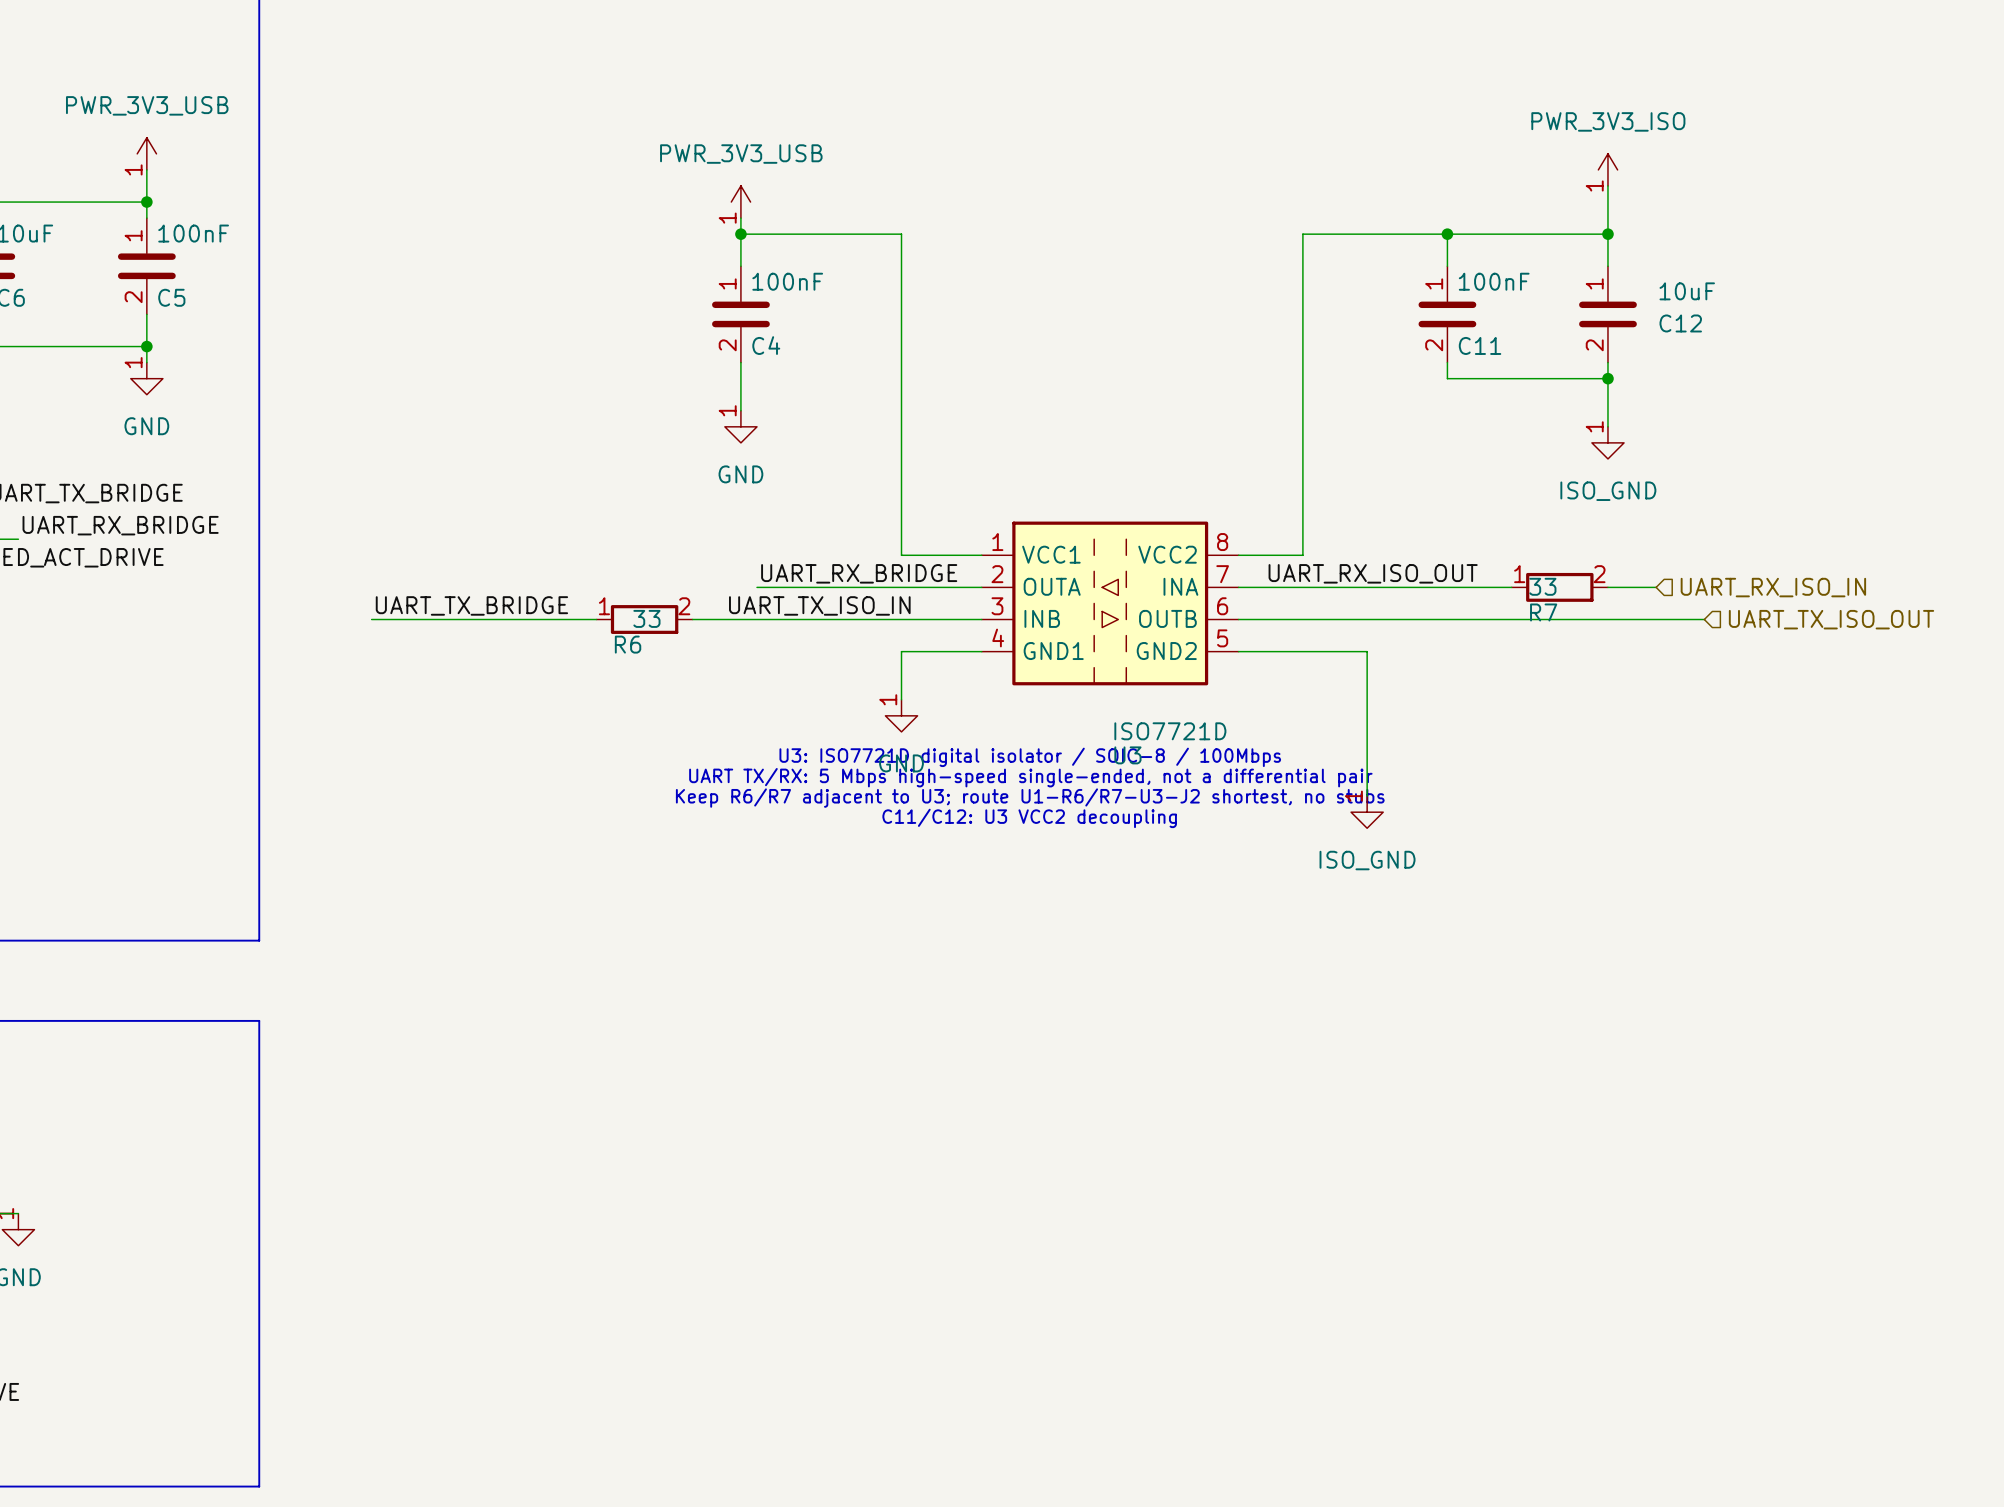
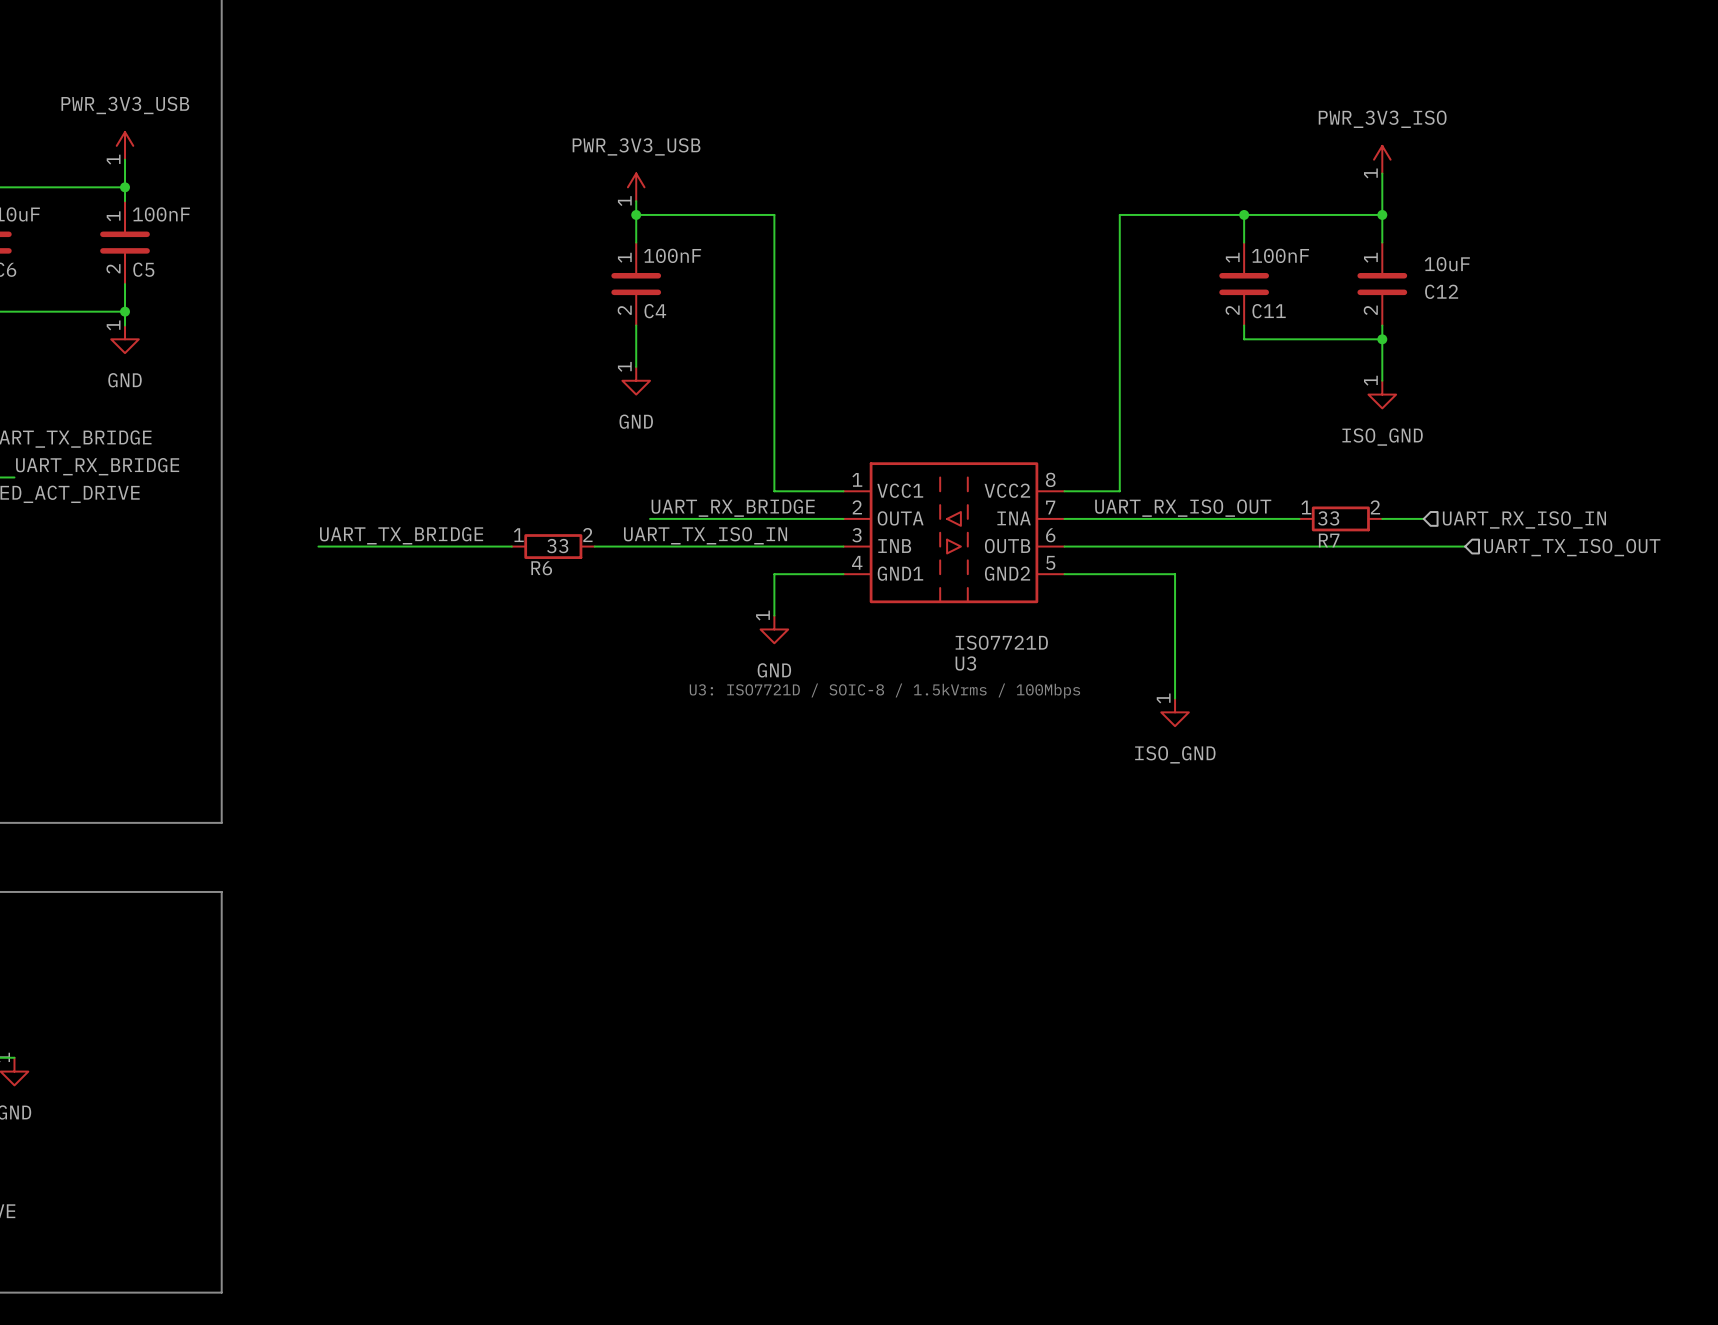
text: U3: ISO7721D digital isolator / SOIC-8 / 100Mbps (1030, 757) -> none
text: UART TX/RX: 5 Mbps high-speed single-ended, not a differential pair (1030, 777) -> none
text: none -> U3: ISO7721D / SOIC-8 / 1.5kVrms / 100Mbps (884, 690)
text: Keep R6/R7 adjacent to U3; route U1-R6/R7-U3-J2 shortest, no stubs (1030, 798) -> none
text: C11/C12: U3 VCC2 decoupling (1029, 818) -> none

